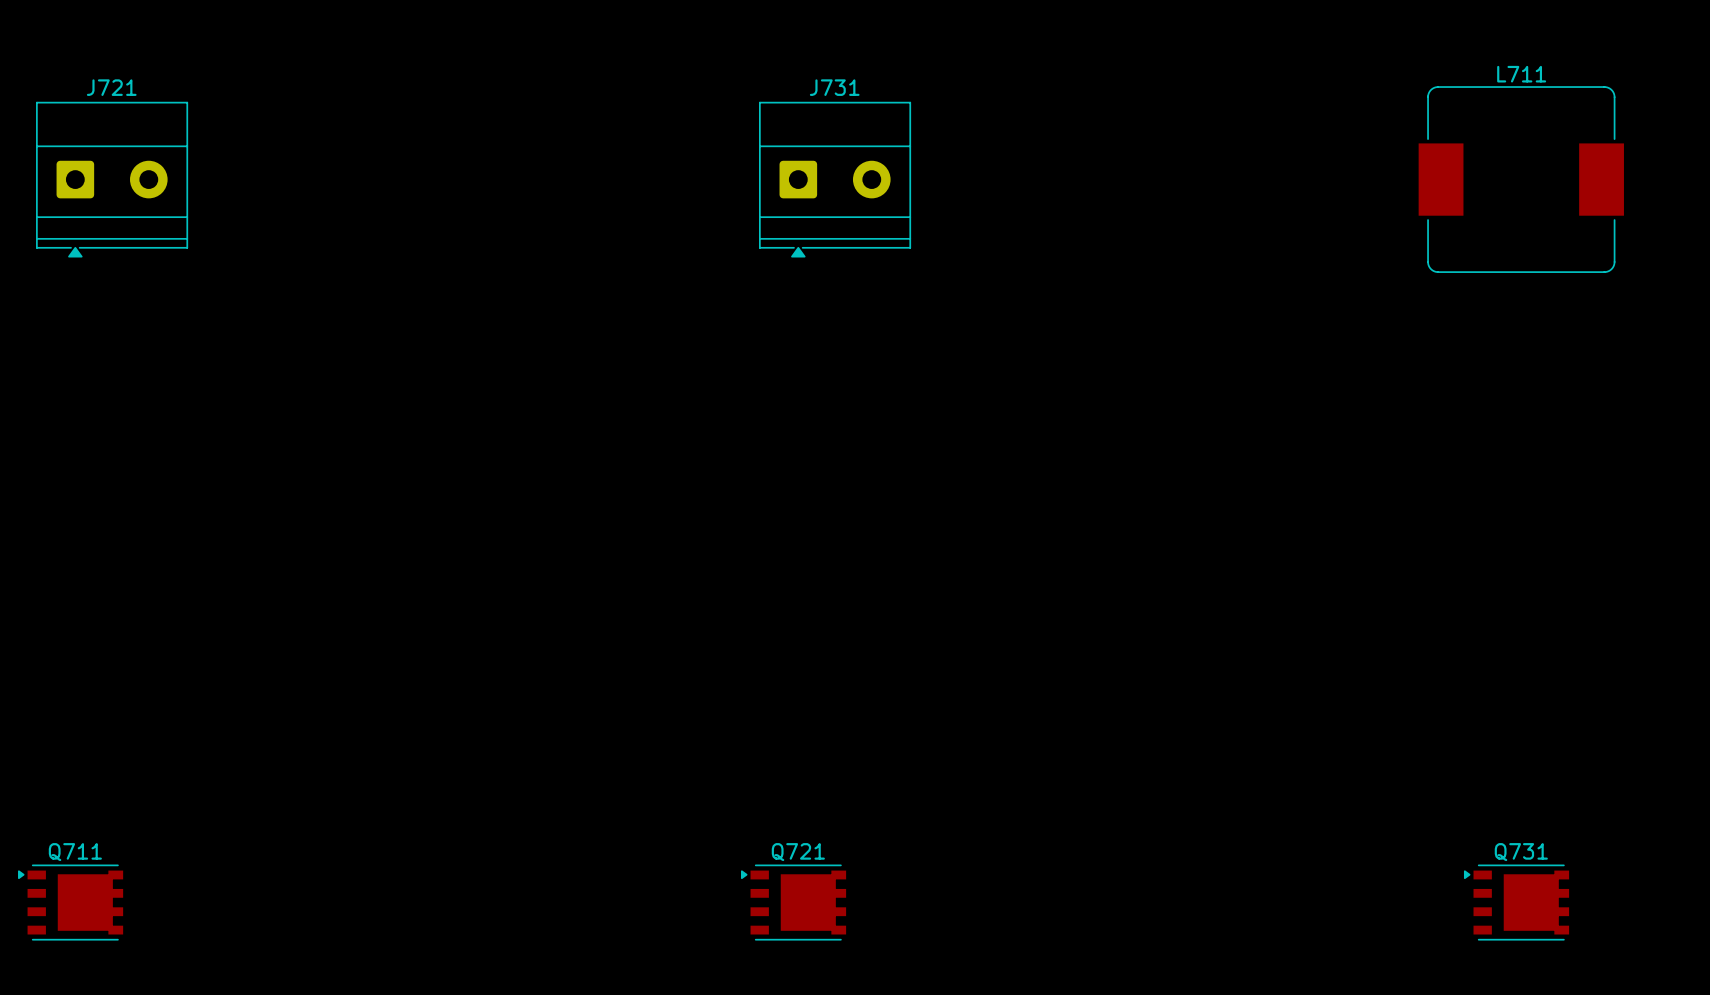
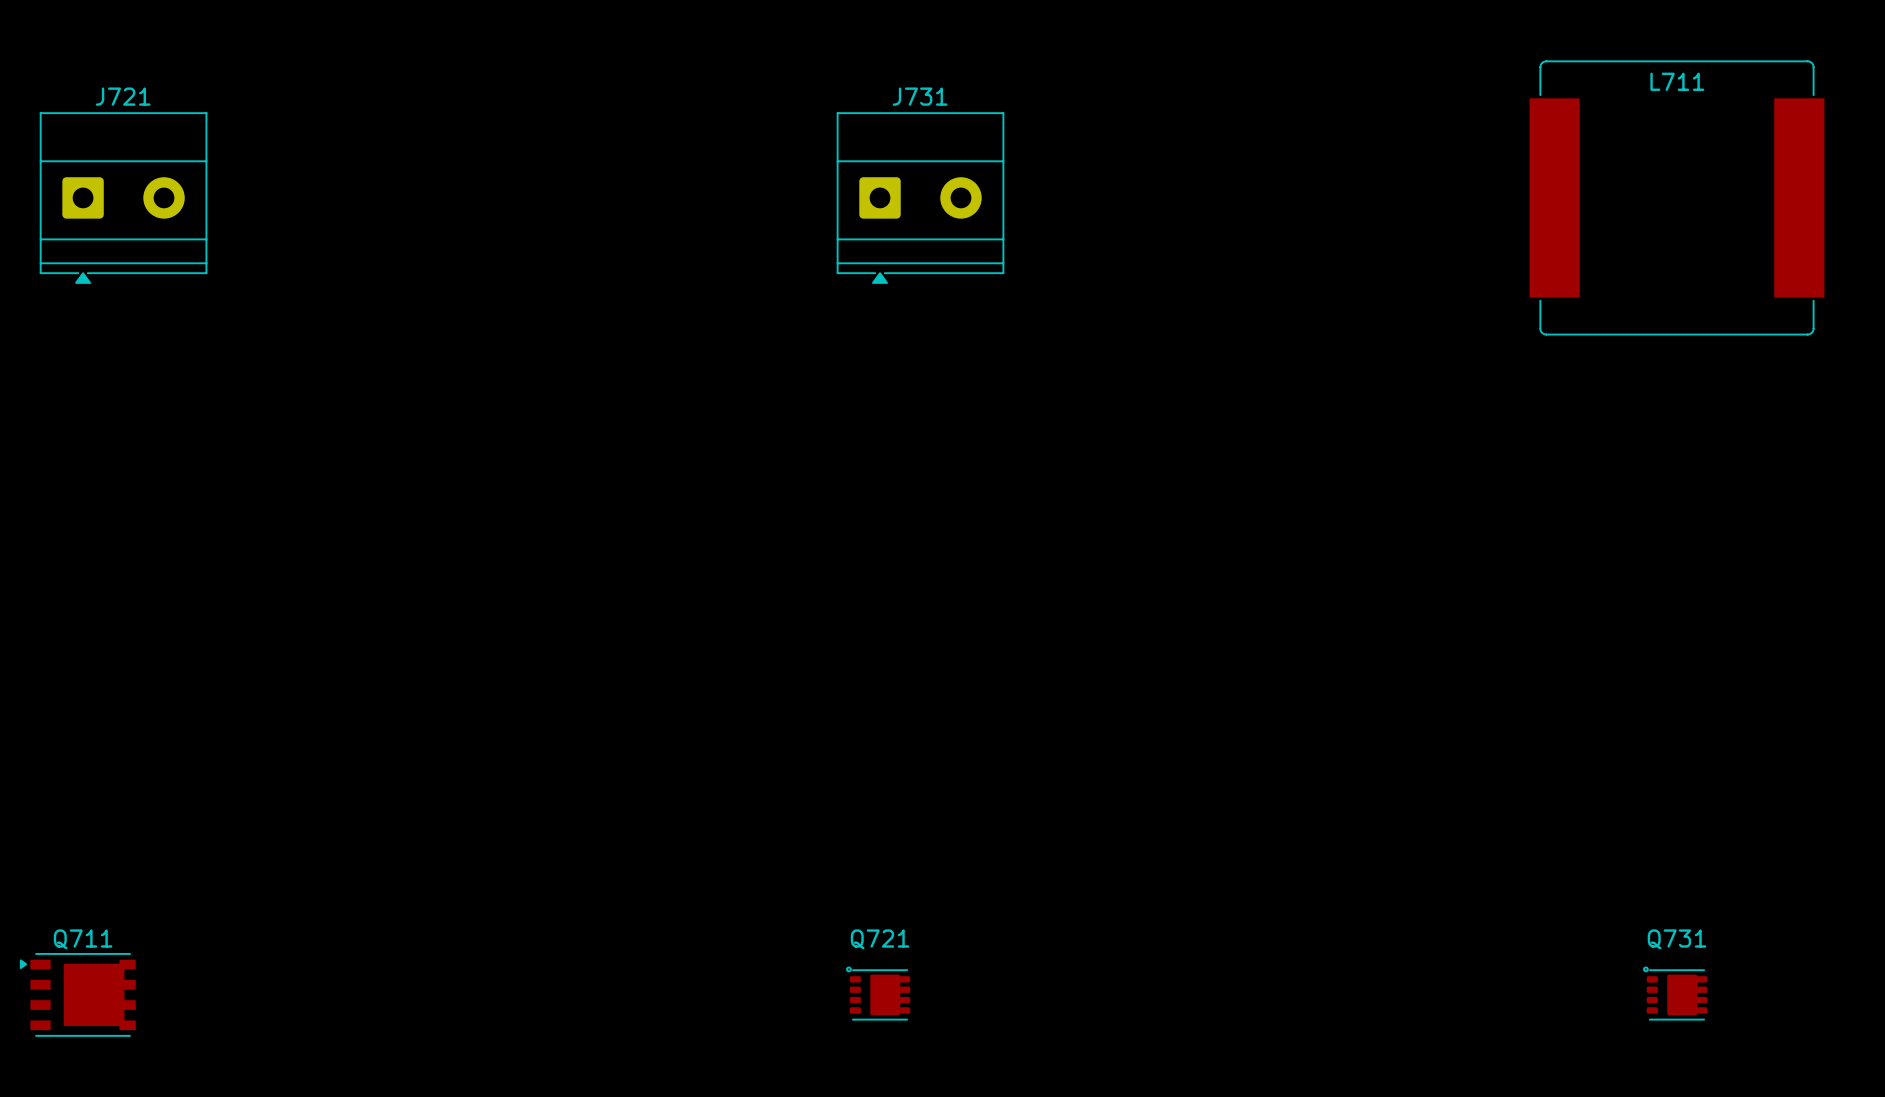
L711 footprint: [1418, 86, 1624, 273] -> [1529, 60, 1825, 336]
Q721 footprint: [740, 864, 847, 941] -> [846, 966, 911, 1021]
Q731 footprint: [1463, 864, 1570, 941] -> [1643, 966, 1708, 1021]

